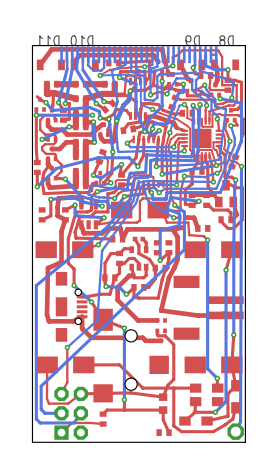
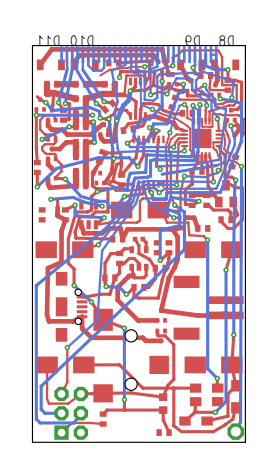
bottom track: (100, 75) (128, 74) (140, 79) -> none
via: (100, 75) -> none
bottom track: (119, 77) (136, 84) (136, 109) (144, 131) -> none
bottom track: (149, 119) (146, 121) (146, 131) (152, 135) (159, 130) -> (149, 119) (143, 119) (134, 128) (134, 137) (139, 143) (143, 143) (156, 130)
top track: none -> (230, 126) (237, 125) (239, 128) (234, 135)
via: none -> (149, 127)
via: (152, 128) -> none
via: none -> (156, 130)
via: (159, 130) -> none
via: (144, 131) -> none
top track: (138, 139) (139, 132) (144, 131) (149, 121) (166, 126) (162, 147) (162, 174) -> none
via: (229, 141) -> none
via: (112, 151) -> none
top track: (102, 152) (107, 160) (106, 173) (100, 180) (100, 186) (112, 188) (115, 185) (115, 181) (128, 180) (134, 175) (149, 175) (153, 177) (153, 183) -> none
top track: (198, 155) (197, 150) (211, 150) (216, 165) -> none
via: none -> (113, 158)
bottom track: (121, 164) (101, 178) (93, 175) -> none
via: (121, 164) -> none
top track: (48, 165) (44, 172) (42, 181) (44, 193) (87, 192) (91, 190) (92, 183) (96, 183) -> none
via: (216, 165) -> none
via: (156, 166) -> none
via: none -> (160, 169)
via: none -> (218, 170)
via: (217, 173) -> none
via: (162, 174) -> none
via: (93, 175) -> none
bottom track: (110, 182) (90, 185) (88, 194) (114, 198) -> none
via: (110, 182) -> none
top track: (138, 183) (138, 188) (123, 190) (114, 198) -> (138, 183) (138, 189) (115, 190) (113, 186) (105, 183) (111, 170) (113, 158)
top track: (121, 184) (113, 192) (107, 193) -> (121, 184) (112, 181) (116, 164) (121, 162) (120, 152) (106, 152) (92, 172) (92, 185) (96, 188) (107, 188) (107, 193)
via: (114, 198) -> none
top track: (50, 199) (50, 215) (42, 219) -> none
top track: (81, 204) (81, 197) (58, 198) (57, 207) -> (57, 200) (57, 207)

